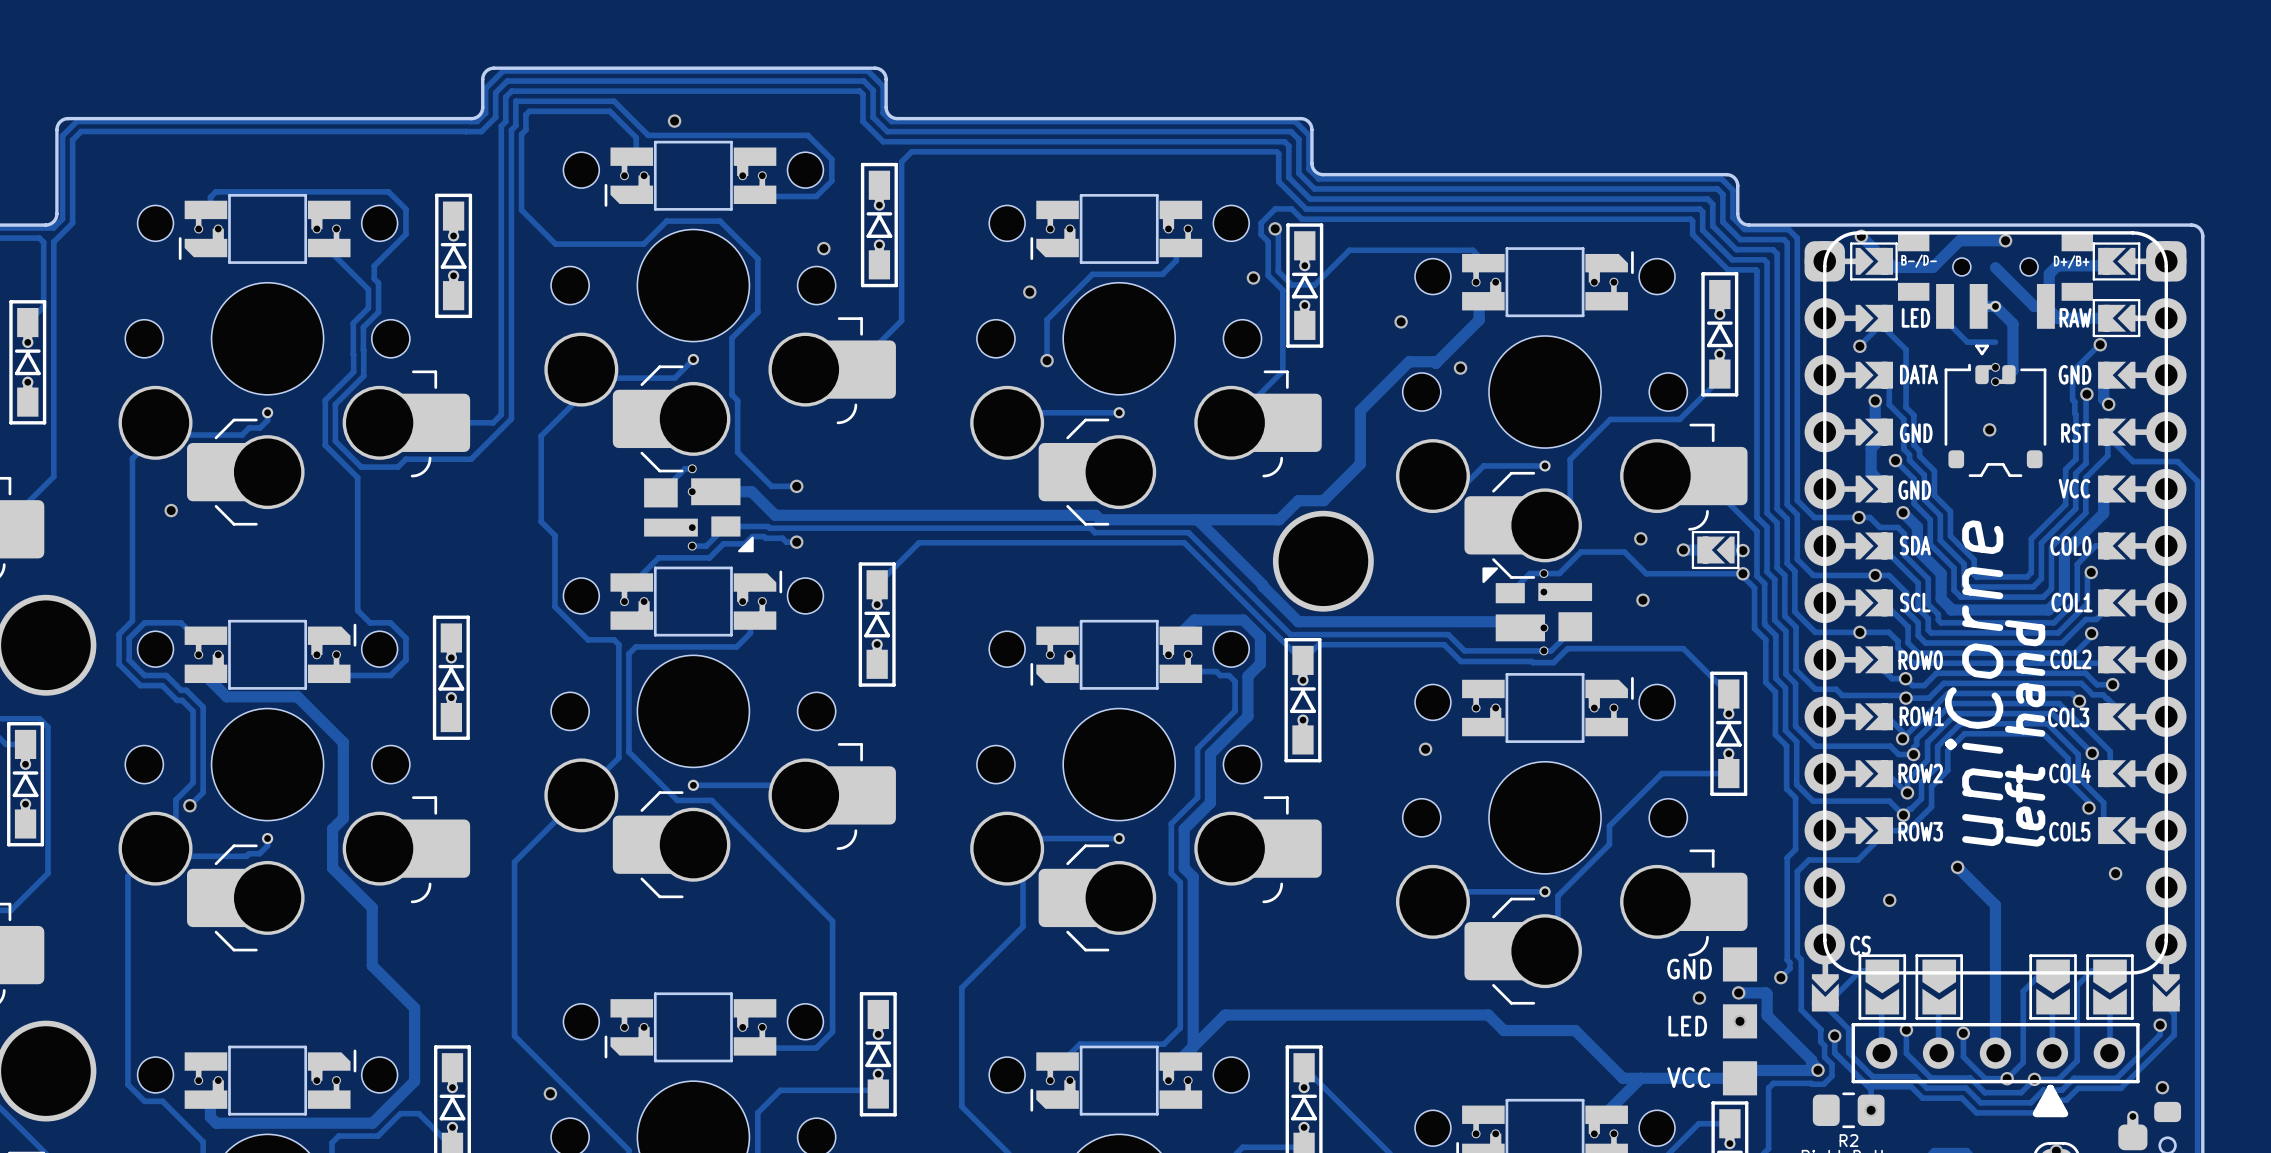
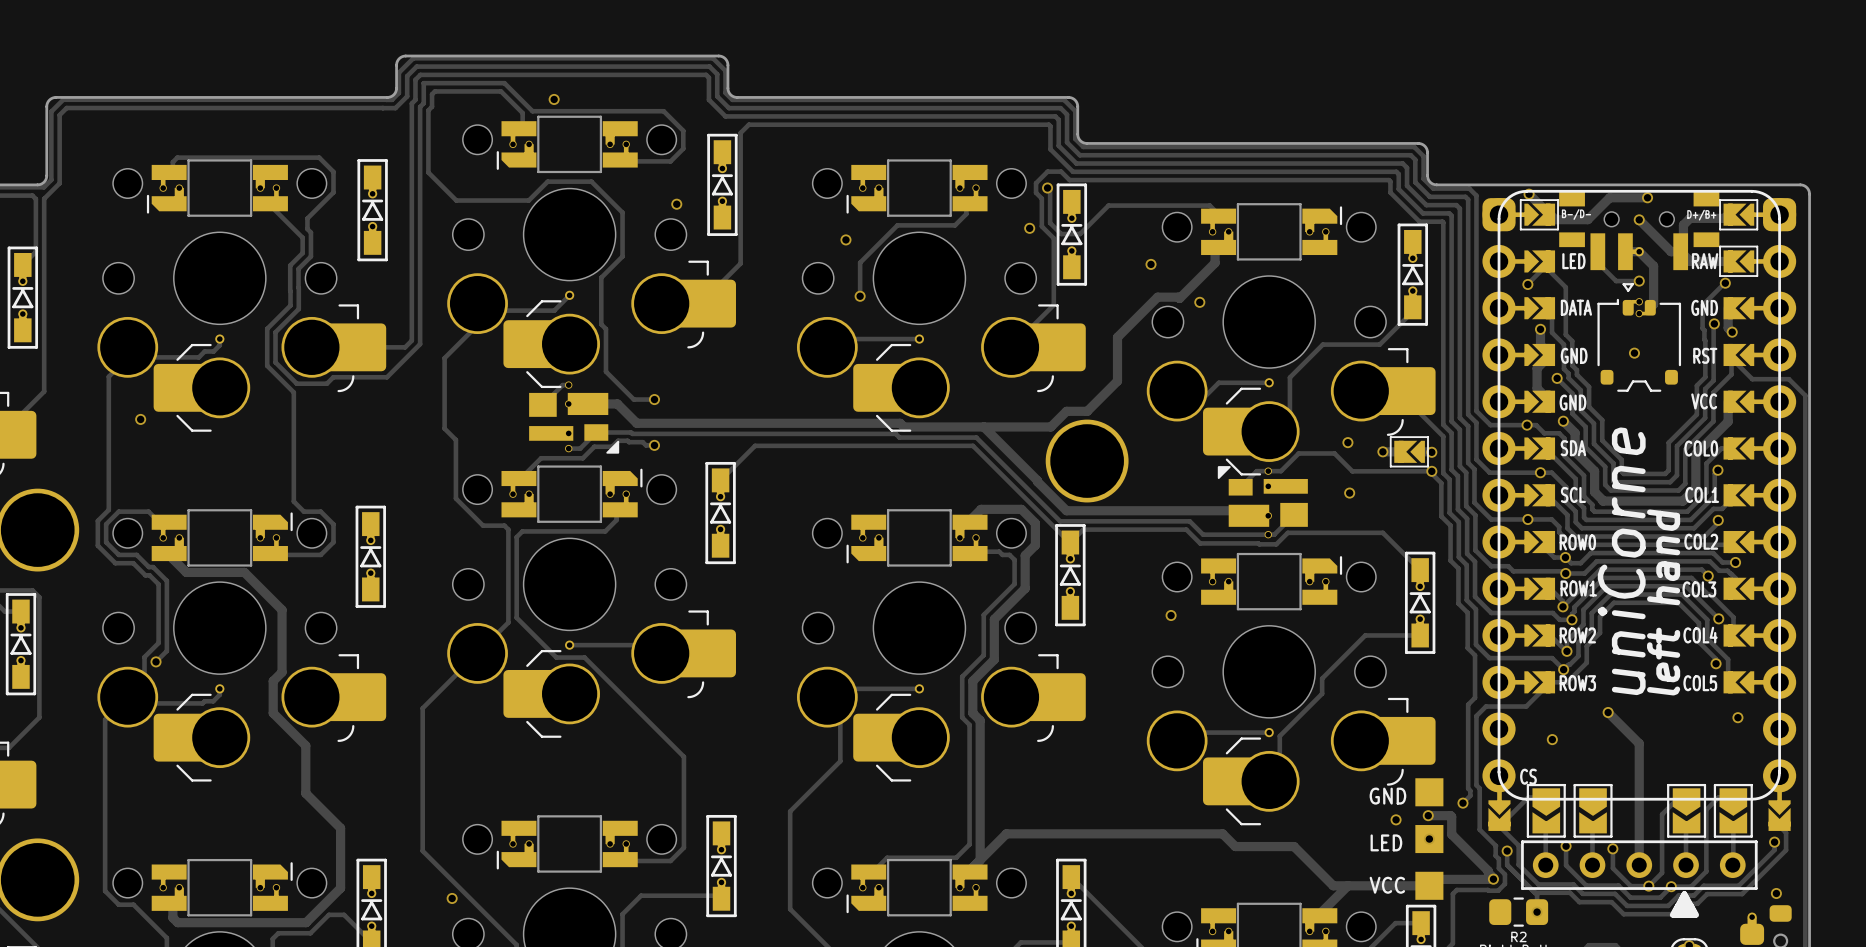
via: none -> (1639, 219)
via: none -> (1639, 281)

